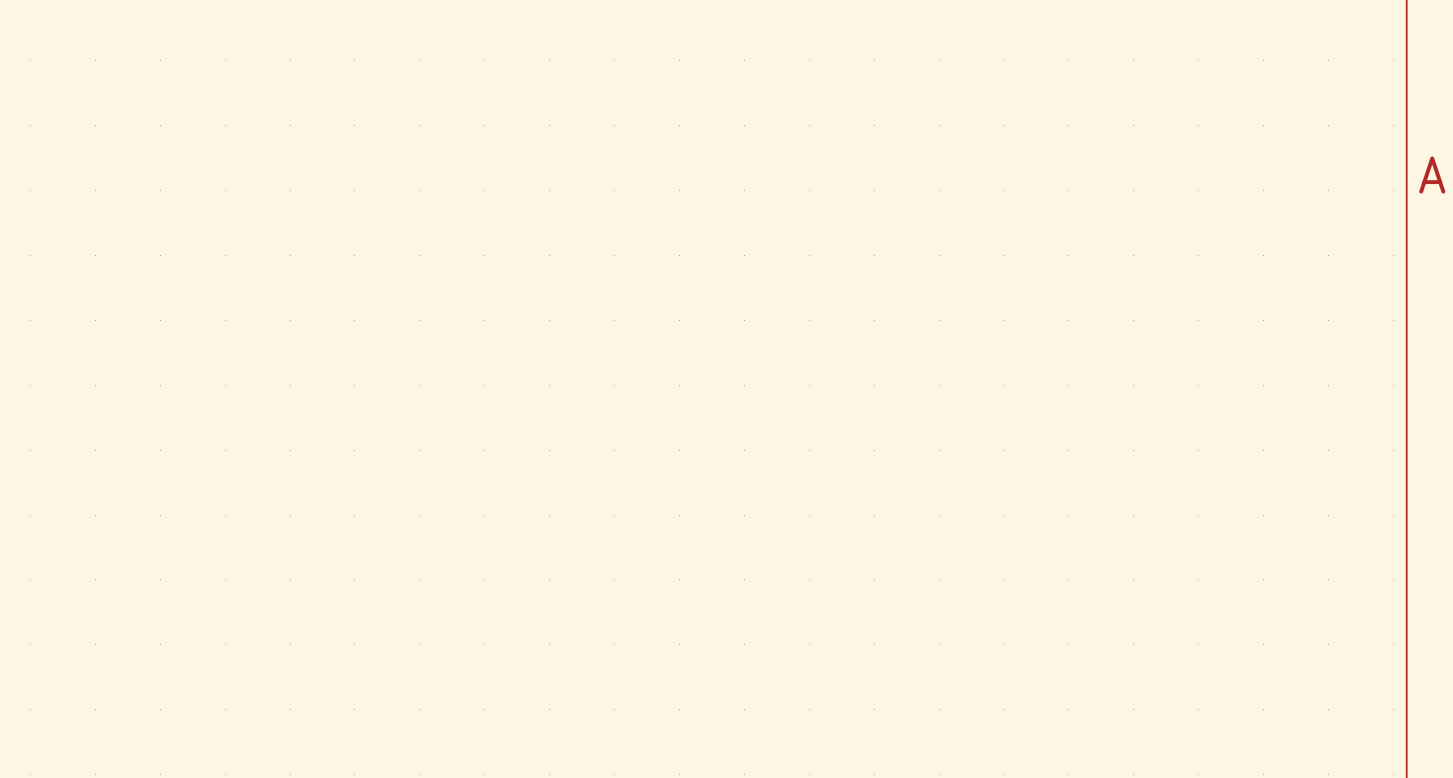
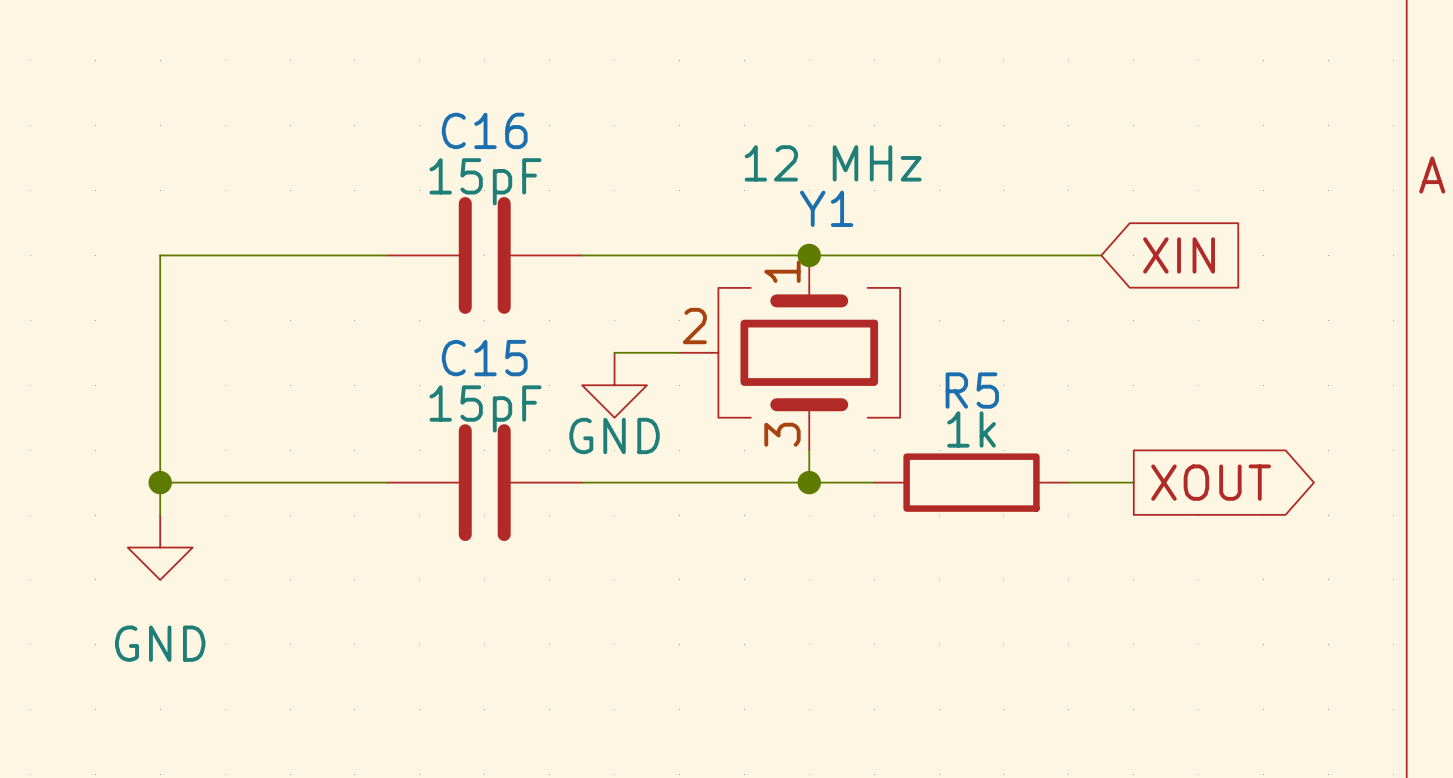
wire: none -> (387, 255) (160, 255) (160, 515)
C16: none -> 15pF (484, 255)
wire: none -> (582, 255) (1101, 255)
junction: none -> (809, 255)
global label: none -> XIN (1179, 255)
wire: none -> (614, 352) (679, 352)
Y1: none -> 12 MHz (789, 352)
power symbol: none -> GND (614, 385)
wire: none -> (809, 450) (809, 482)
wire: none -> (160, 482) (387, 482)
junction: none -> (160, 482)
C15: none -> 15pF (484, 482)
wire: none -> (582, 482) (874, 482)
junction: none -> (809, 482)
R5: none -> 1k (971, 482)
wire: none -> (1068, 482) (1133, 482)
global label: none -> XOUT (1211, 482)
power symbol: none -> GND (160, 547)

